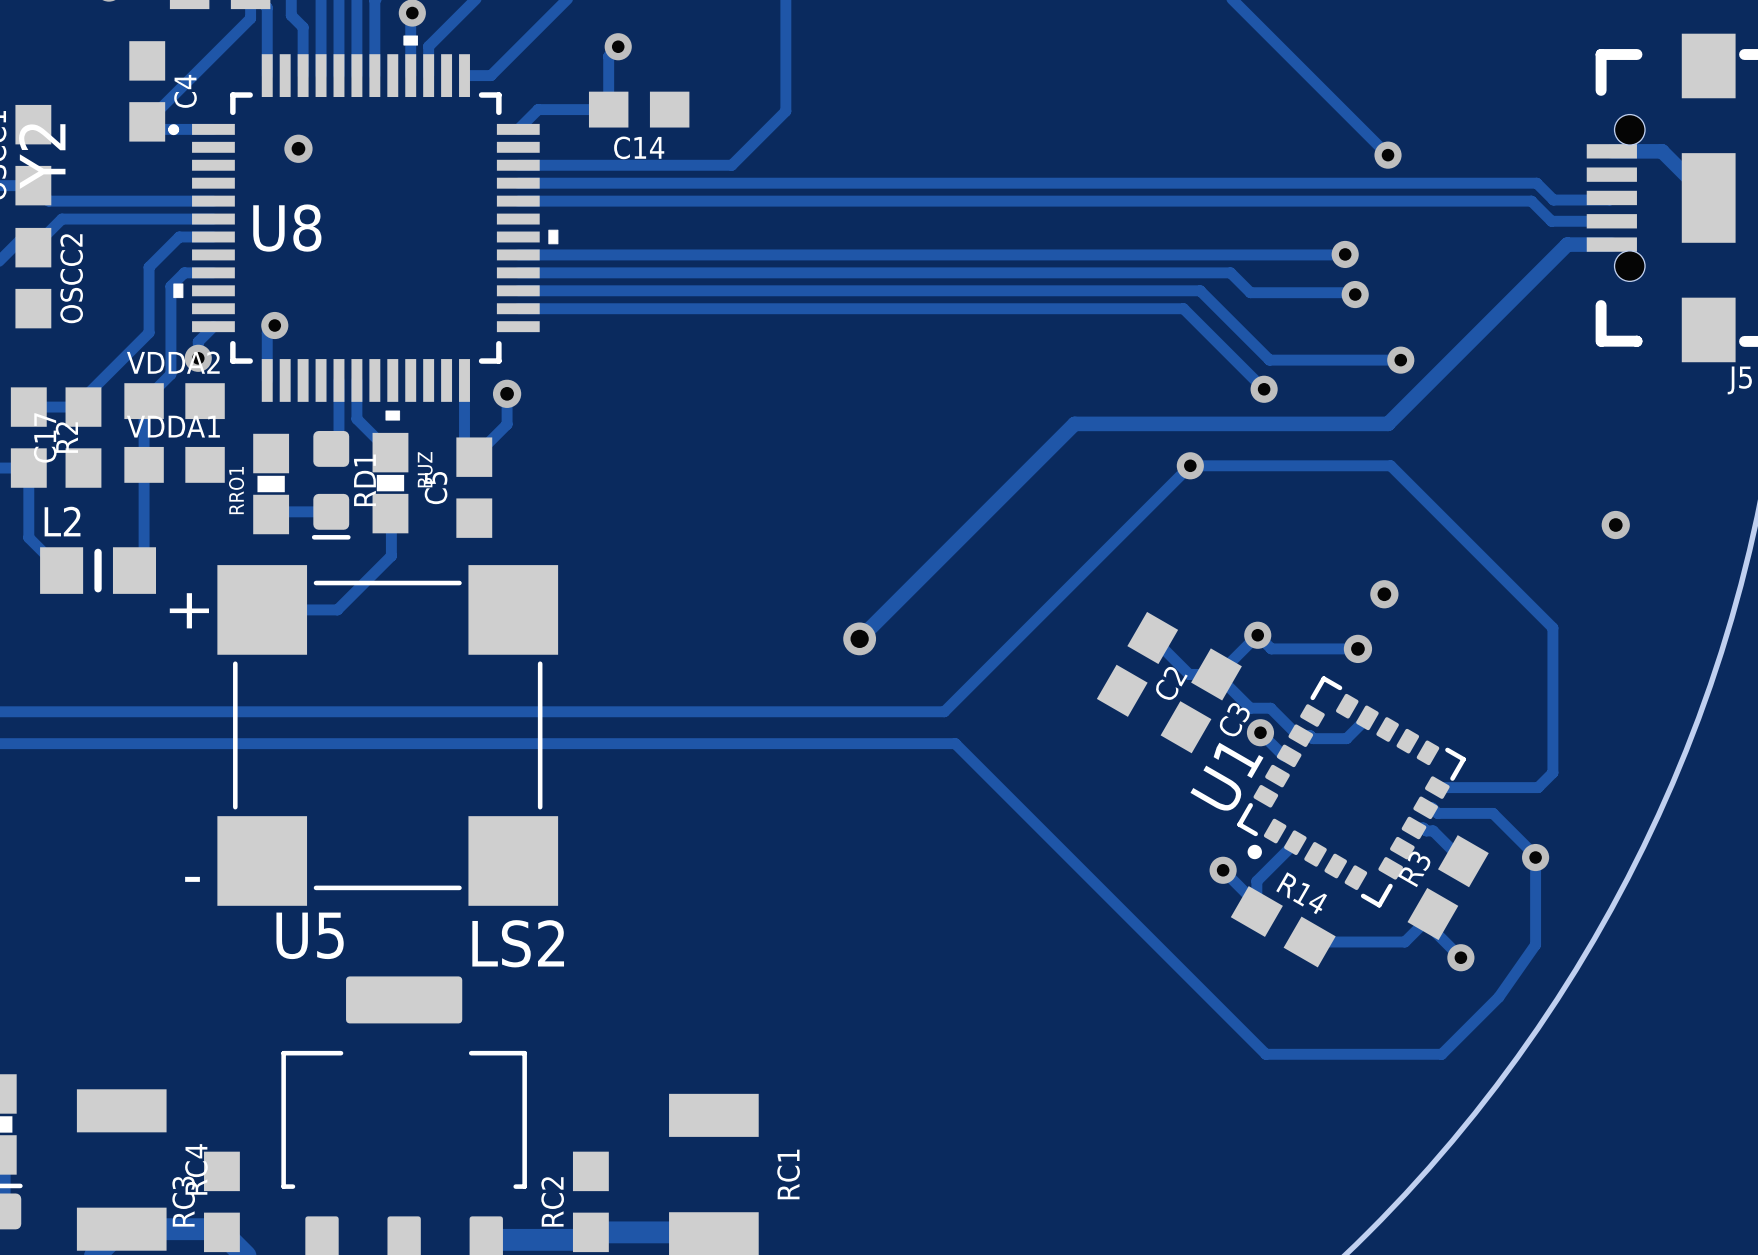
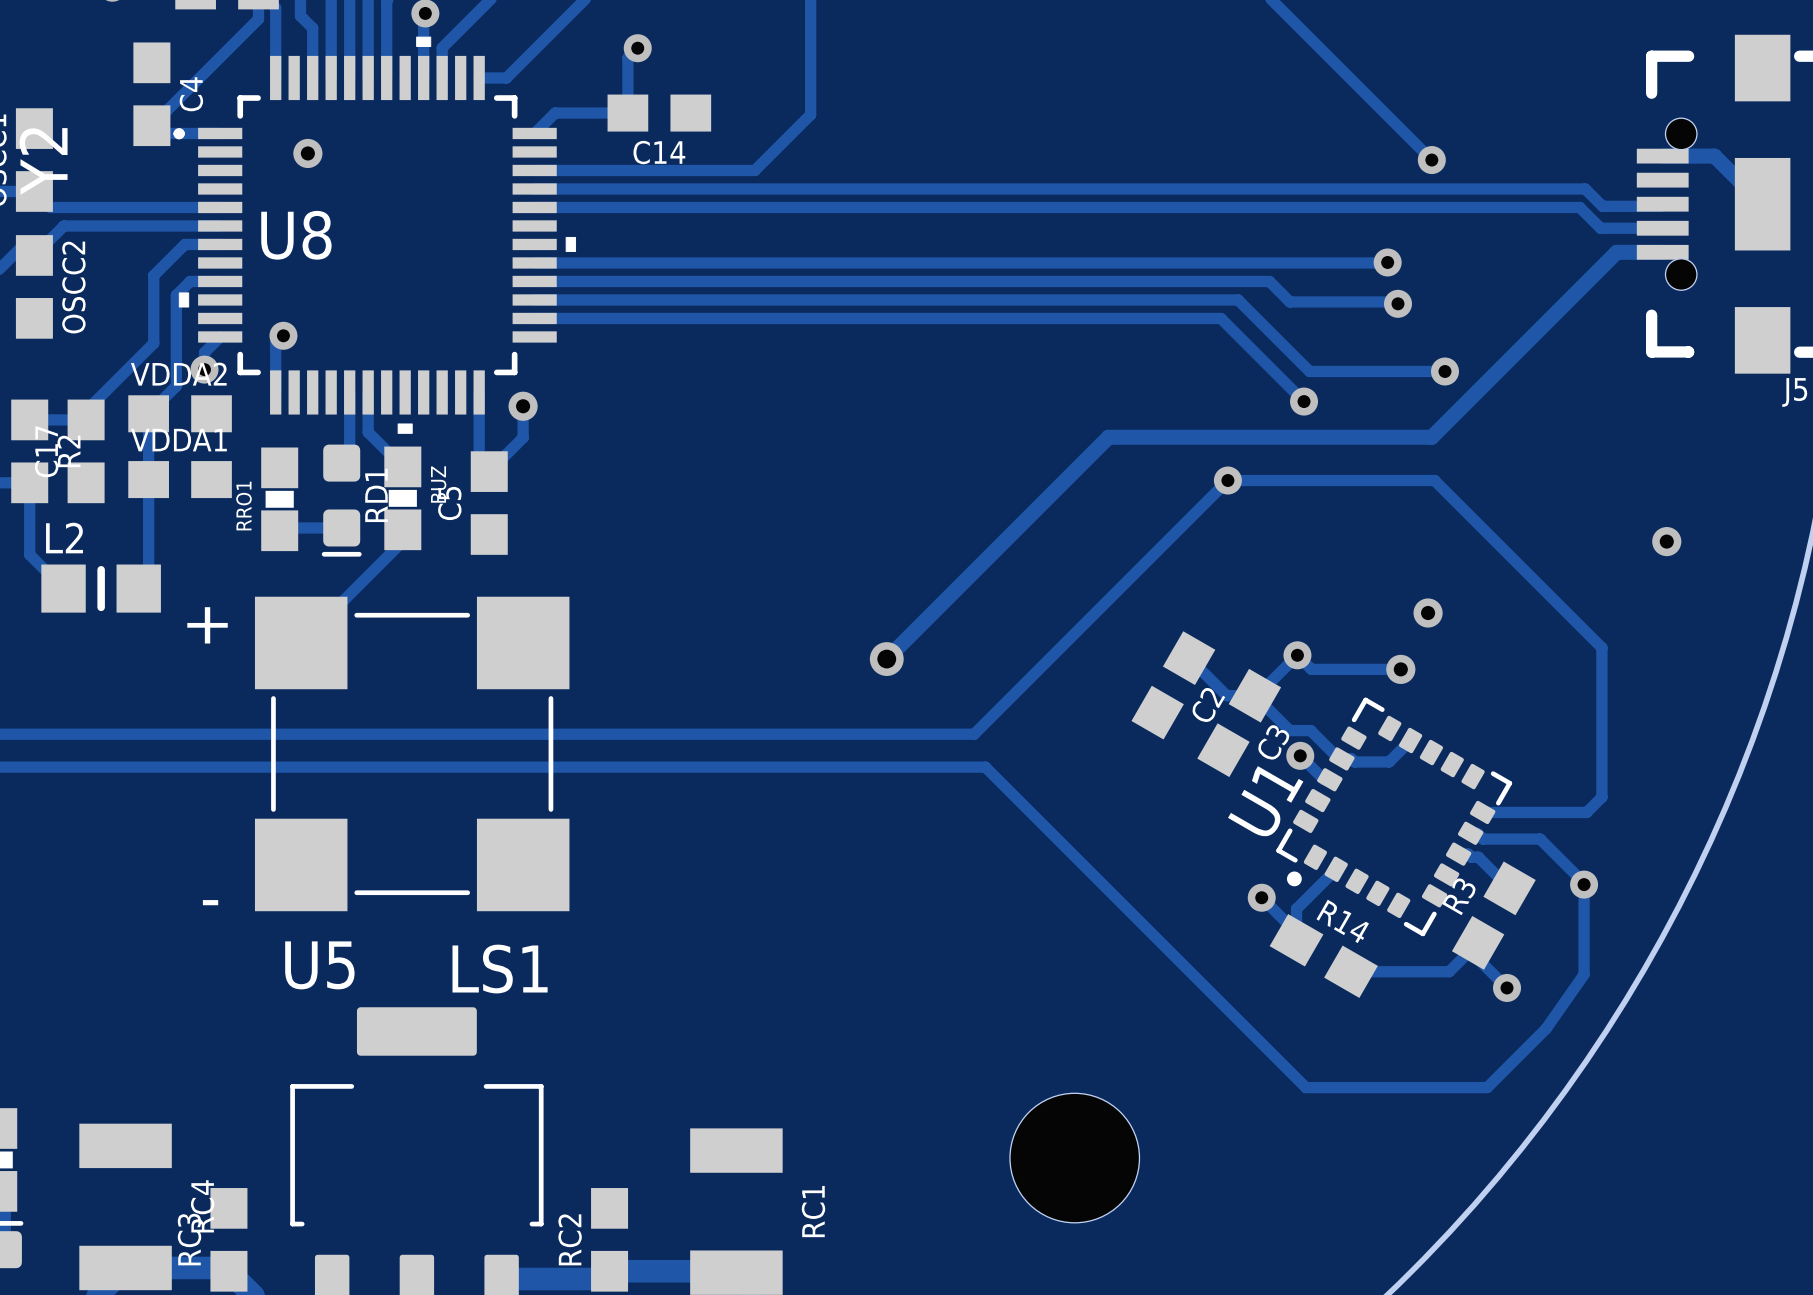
track: (390, 513) (391, 555) (337, 609) (262, 609) -> (402, 529) (402, 541) (301, 642)
LS1: none -> (412, 753)
LS2: (387, 735) -> none
hole: none -> (1074, 1158)

